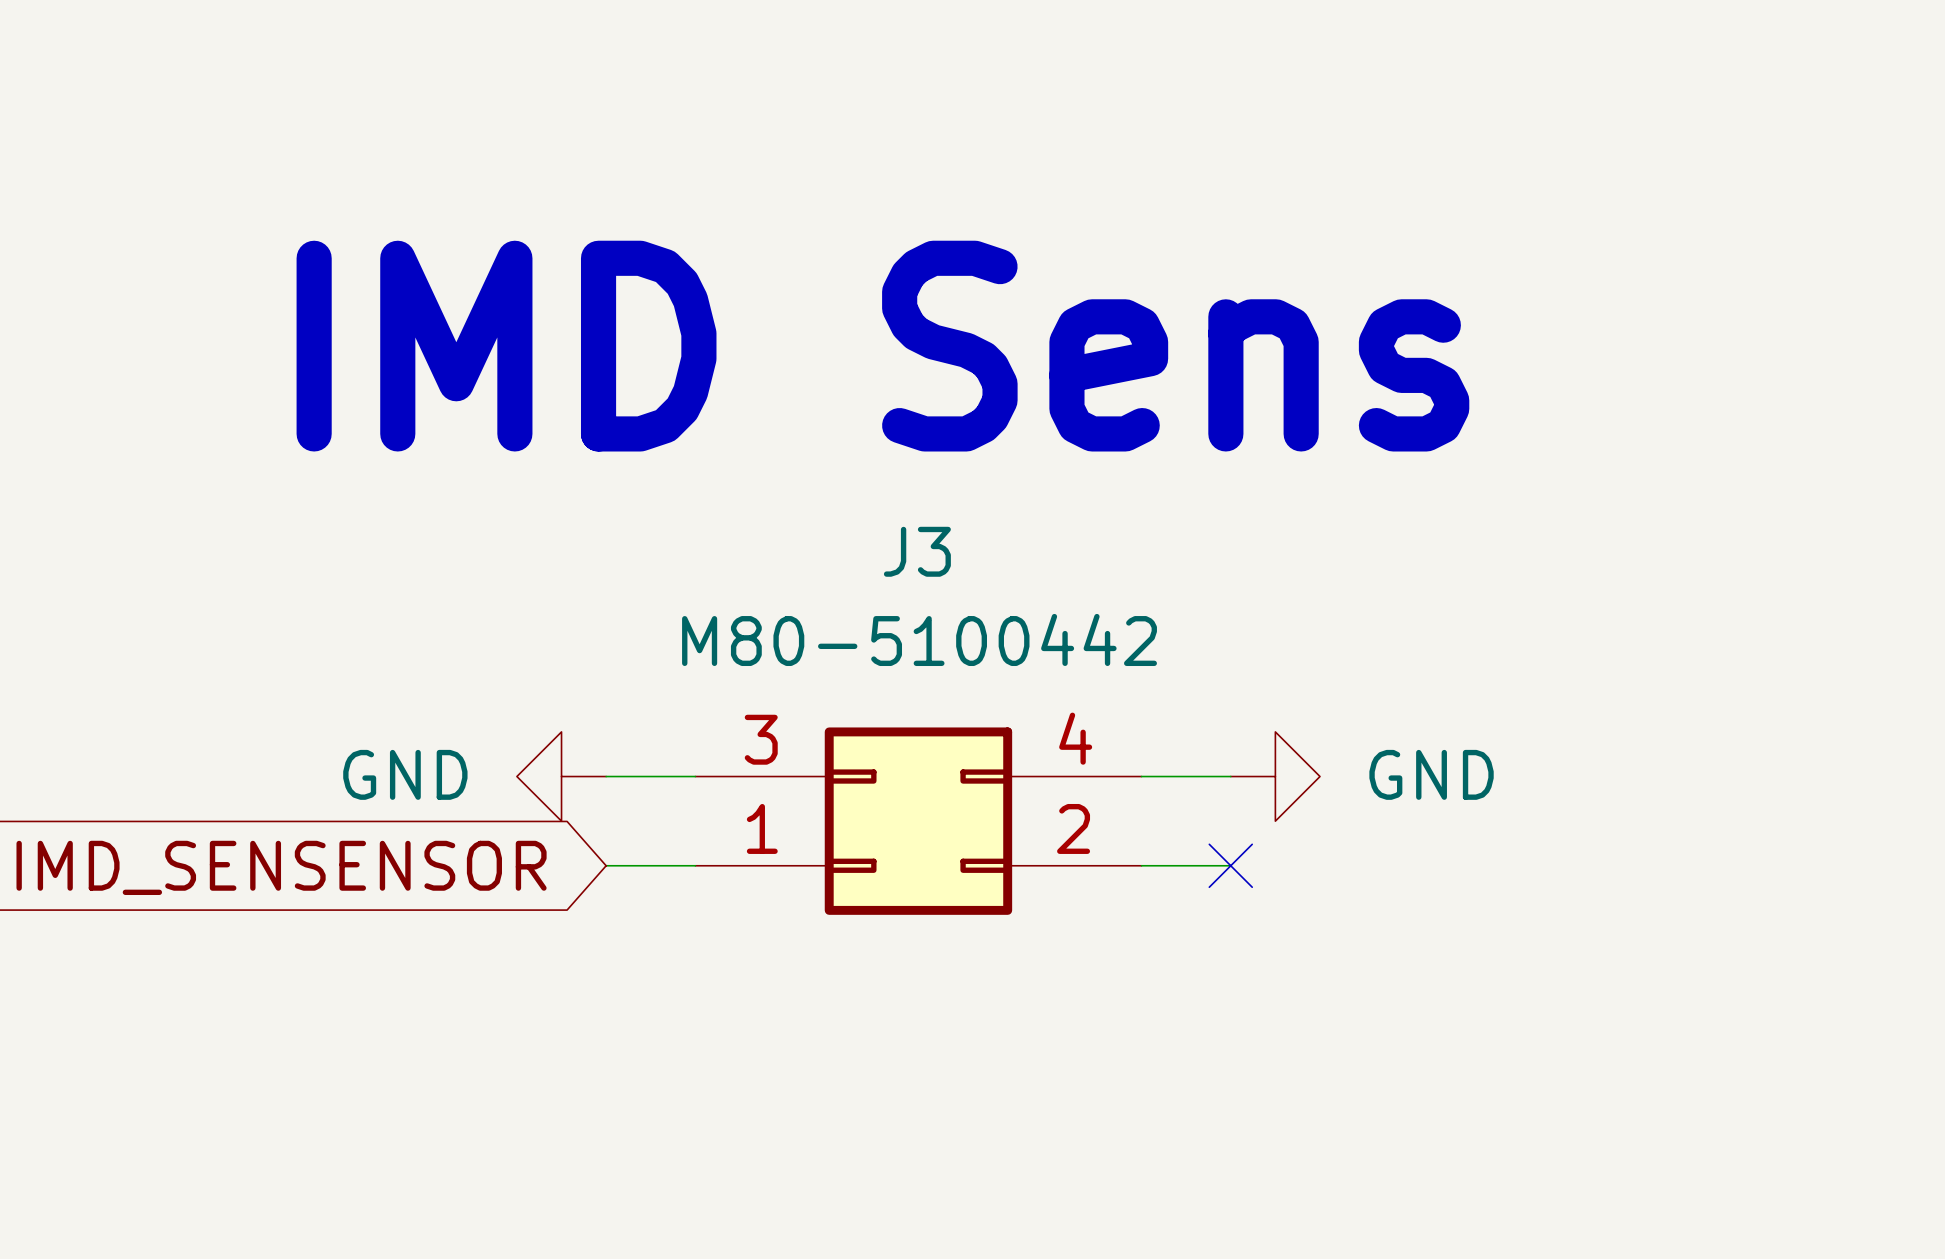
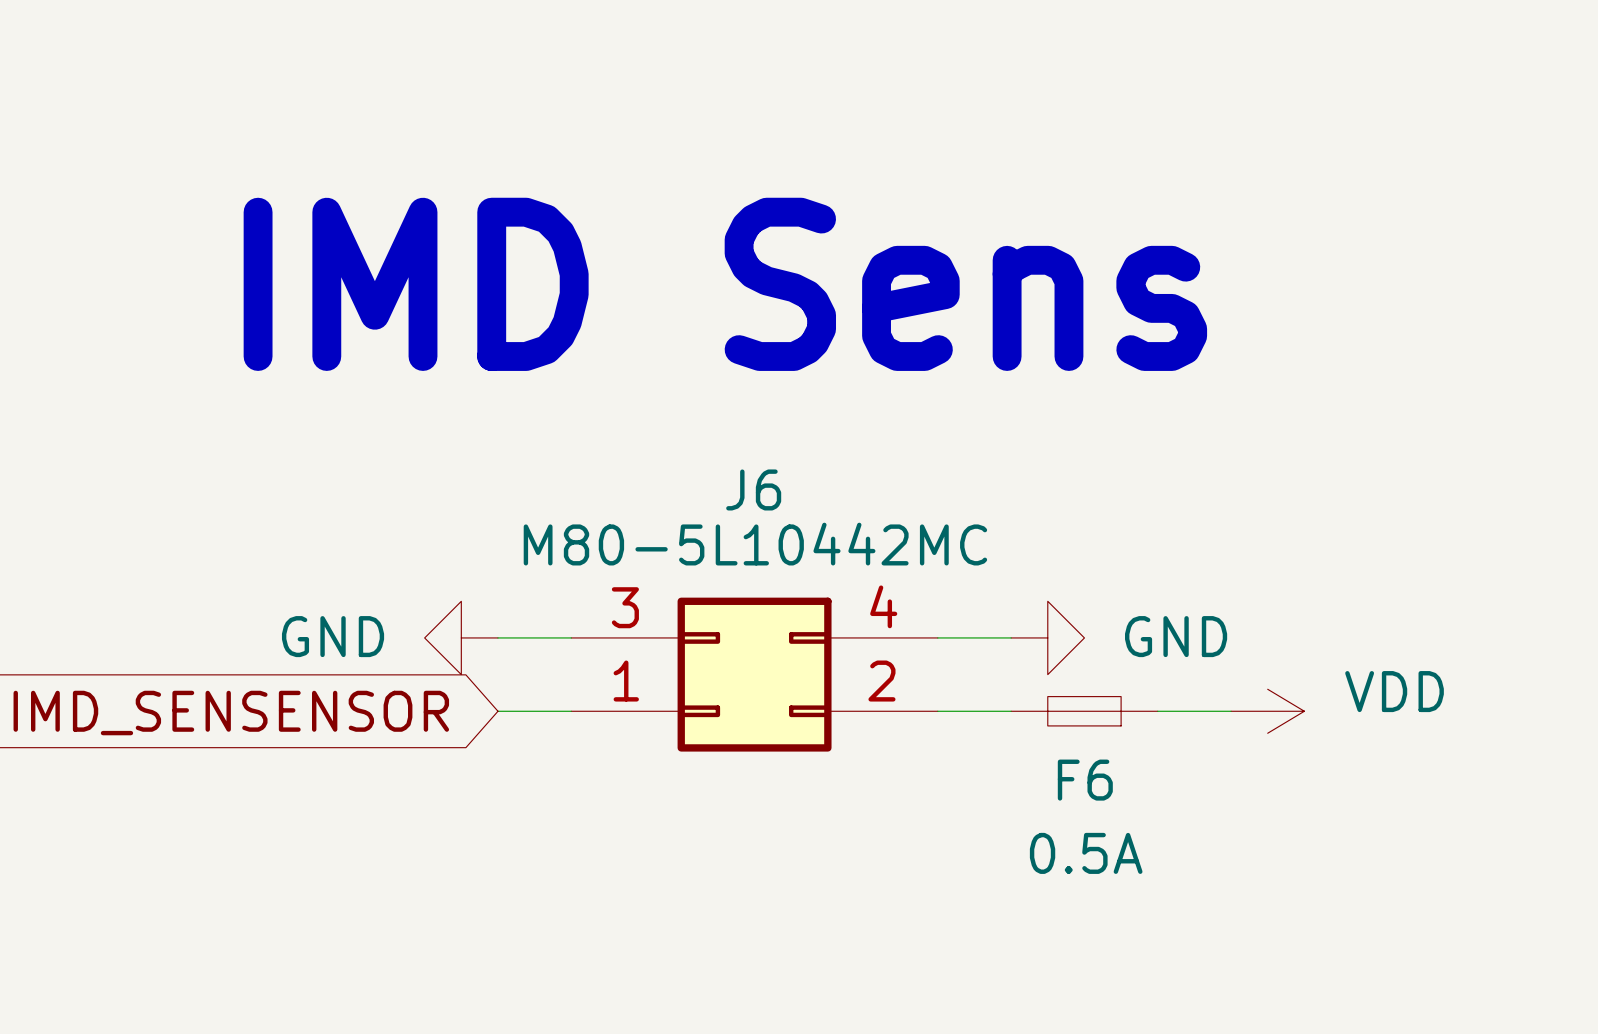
J3 name: J3 (917, 551) -> J6 (753, 489)
J3 value: M80-5100442 (919, 639) -> M80-5L10442MC (755, 544)
no-connect mark: (1230, 865) -> none
F6: none -> 0.5A (1084, 711)
wire: none -> (1157, 711) (1231, 711)
power symbol: none -> VDD (1267, 711)

